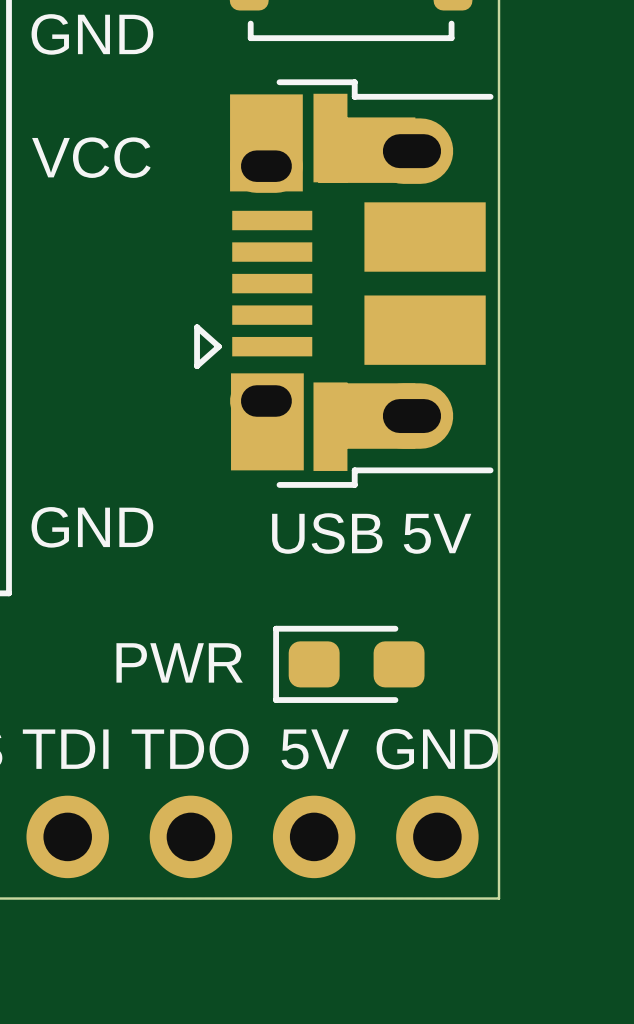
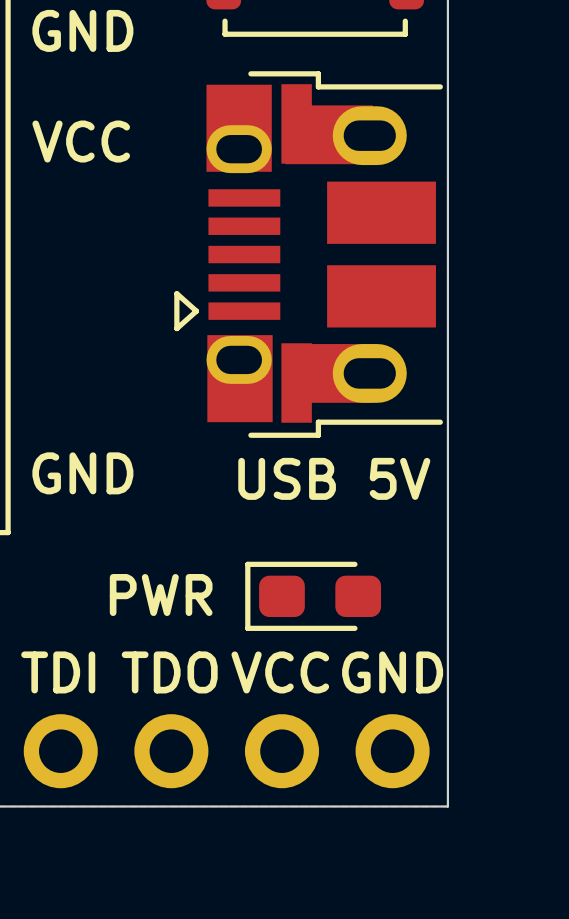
text: 5V (315, 749) -> VCC (280, 672)

